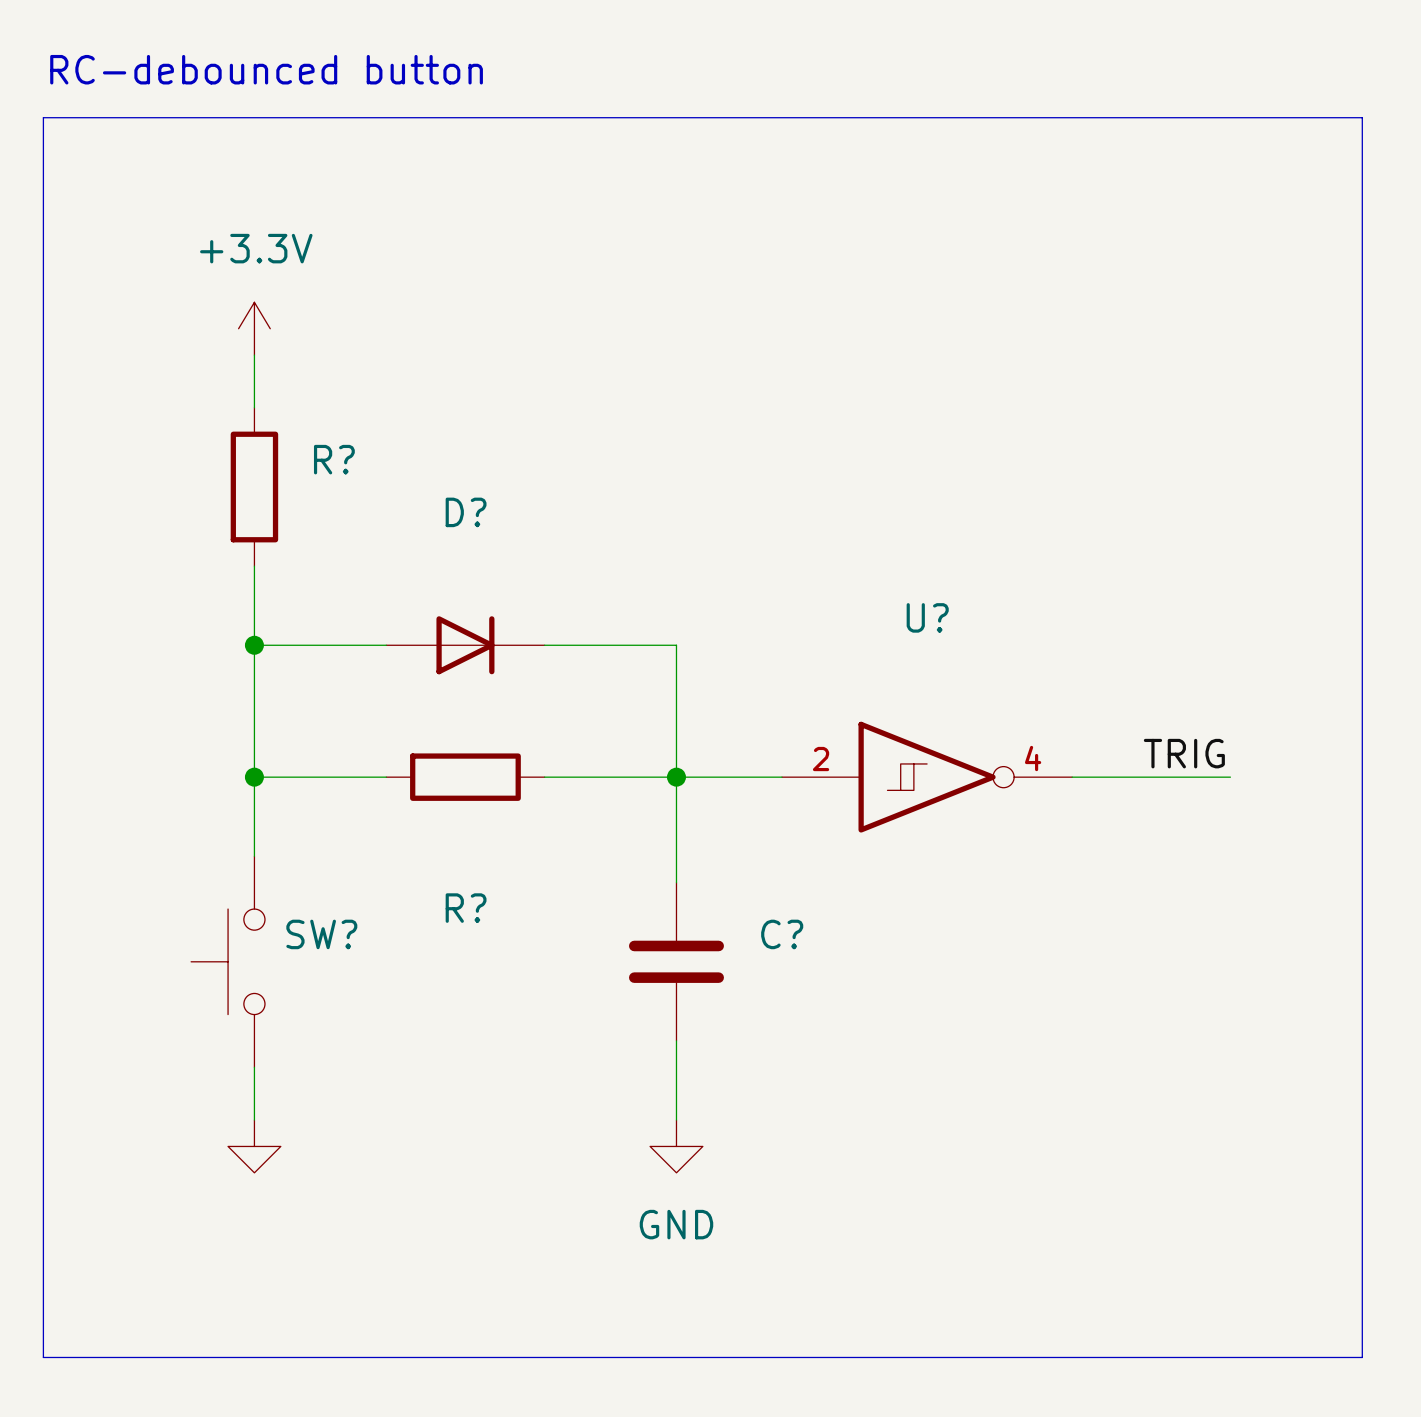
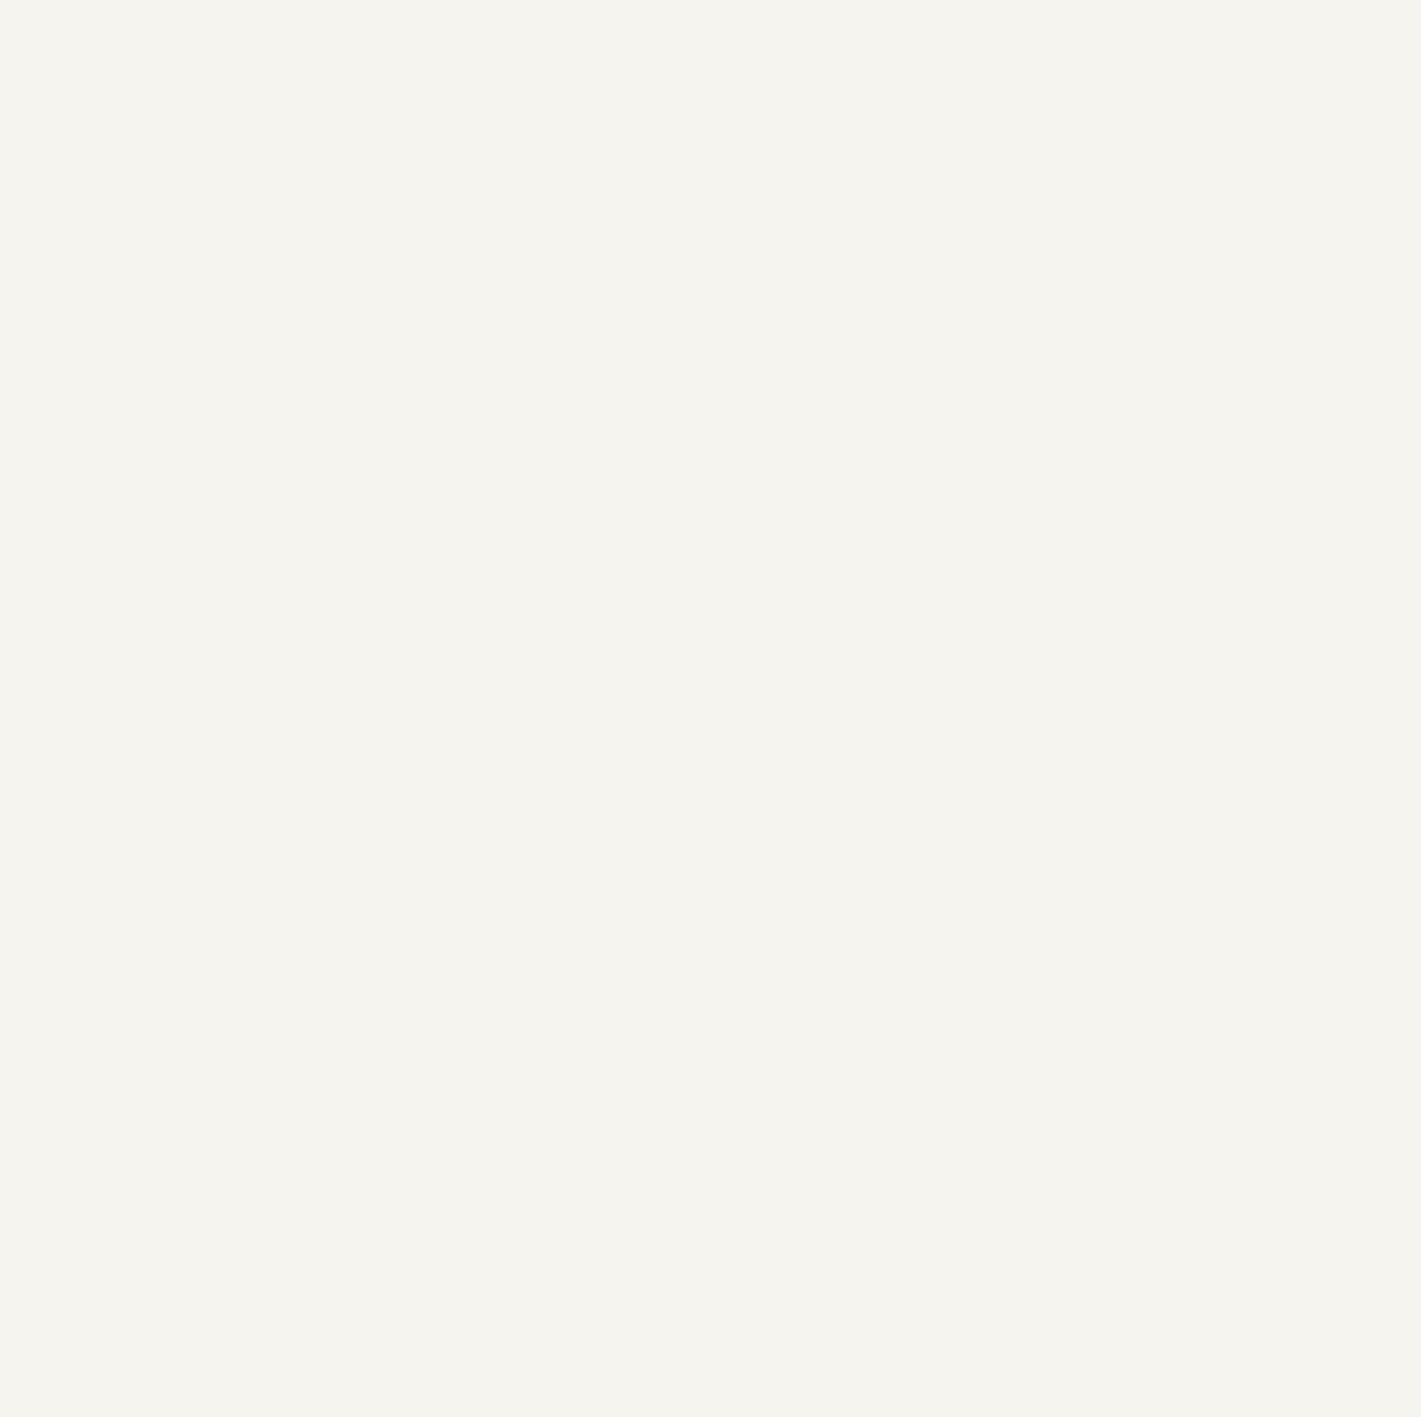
text: RC-debounced button (266, 69) -> none
line: (43, 117) (43, 1357) (1362, 1357) (1362, 117) (43, 117) -> none
power symbol: +3.3V (254, 328) -> none
wire: (254, 355) (254, 407) -> none
R?: (254, 487) -> none
wire: (254, 566) (254, 856) -> none
wire: (254, 645) (386, 645) -> none
junction: (254, 645) -> none
D?: (465, 645) -> none
wire: (544, 645) (676, 645) (676, 882) -> none
label: TRIG (1184, 753) -> none
wire: (254, 777) (386, 777) -> none
junction: (254, 777) -> none
R?: (465, 777) -> none
wire: (544, 777) (781, 777) -> none
junction: (676, 777) -> none
U?: (927, 777) -> none
wire: (1072, 777) (1230, 777) -> none
SW?: (228, 961) -> none
C?: (676, 961) -> none
wire: (676, 1040) (676, 1120) -> none
wire: (254, 1067) (254, 1120) -> none
power symbol: (254, 1146) -> none
power symbol: GND (676, 1146) -> none

